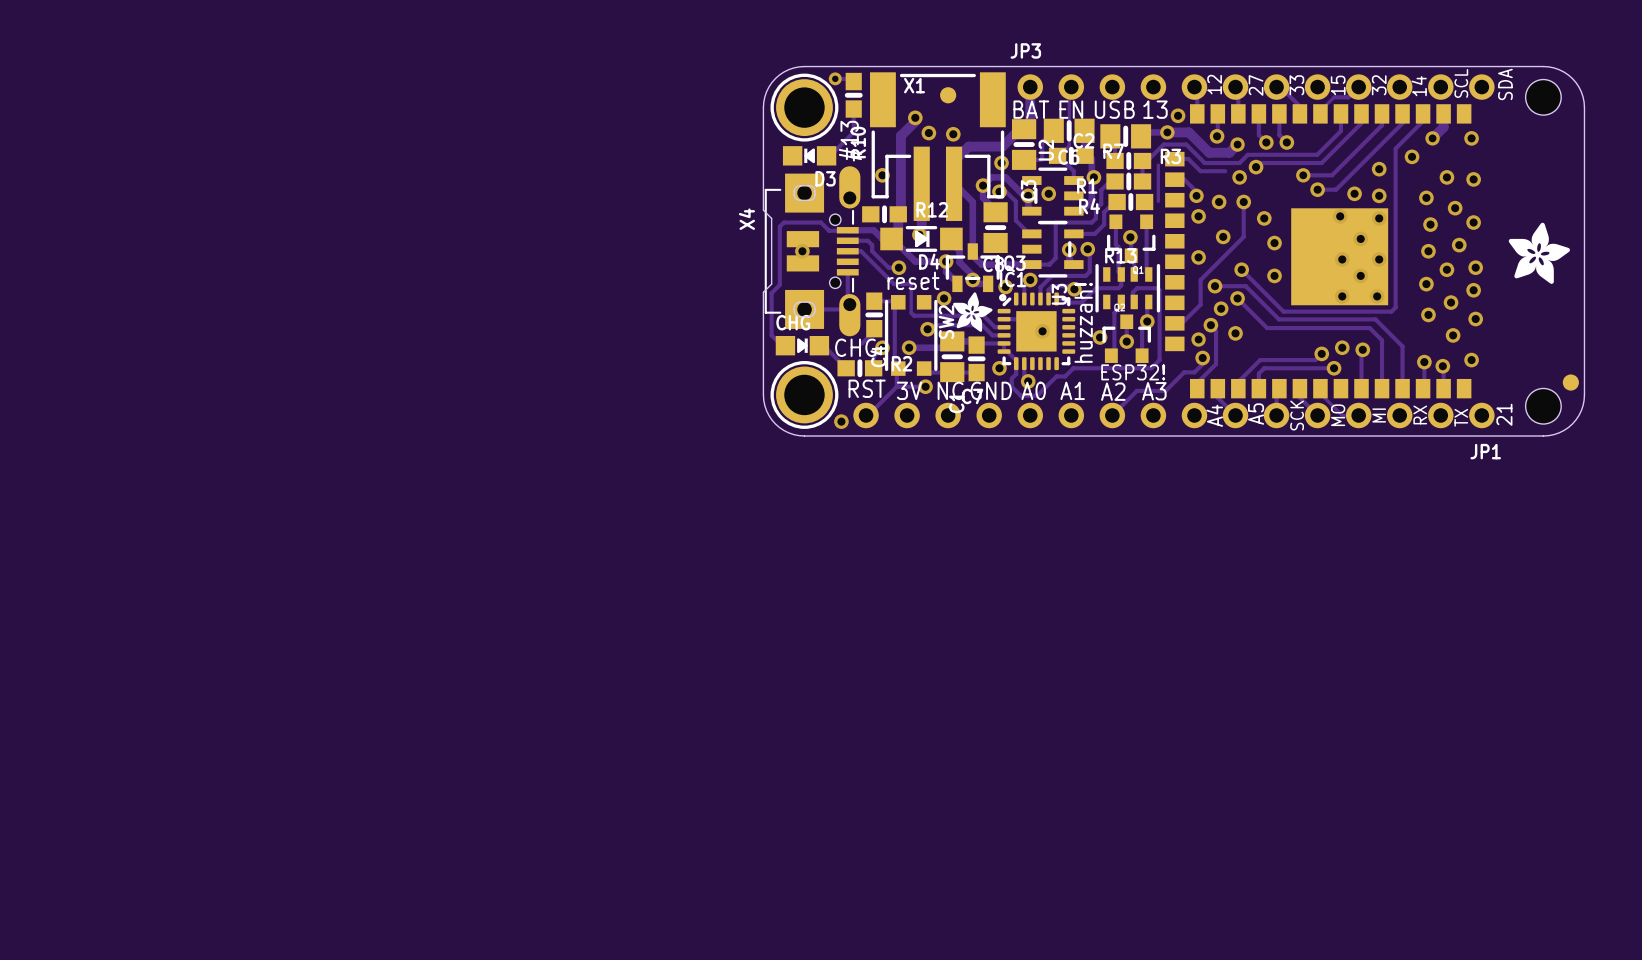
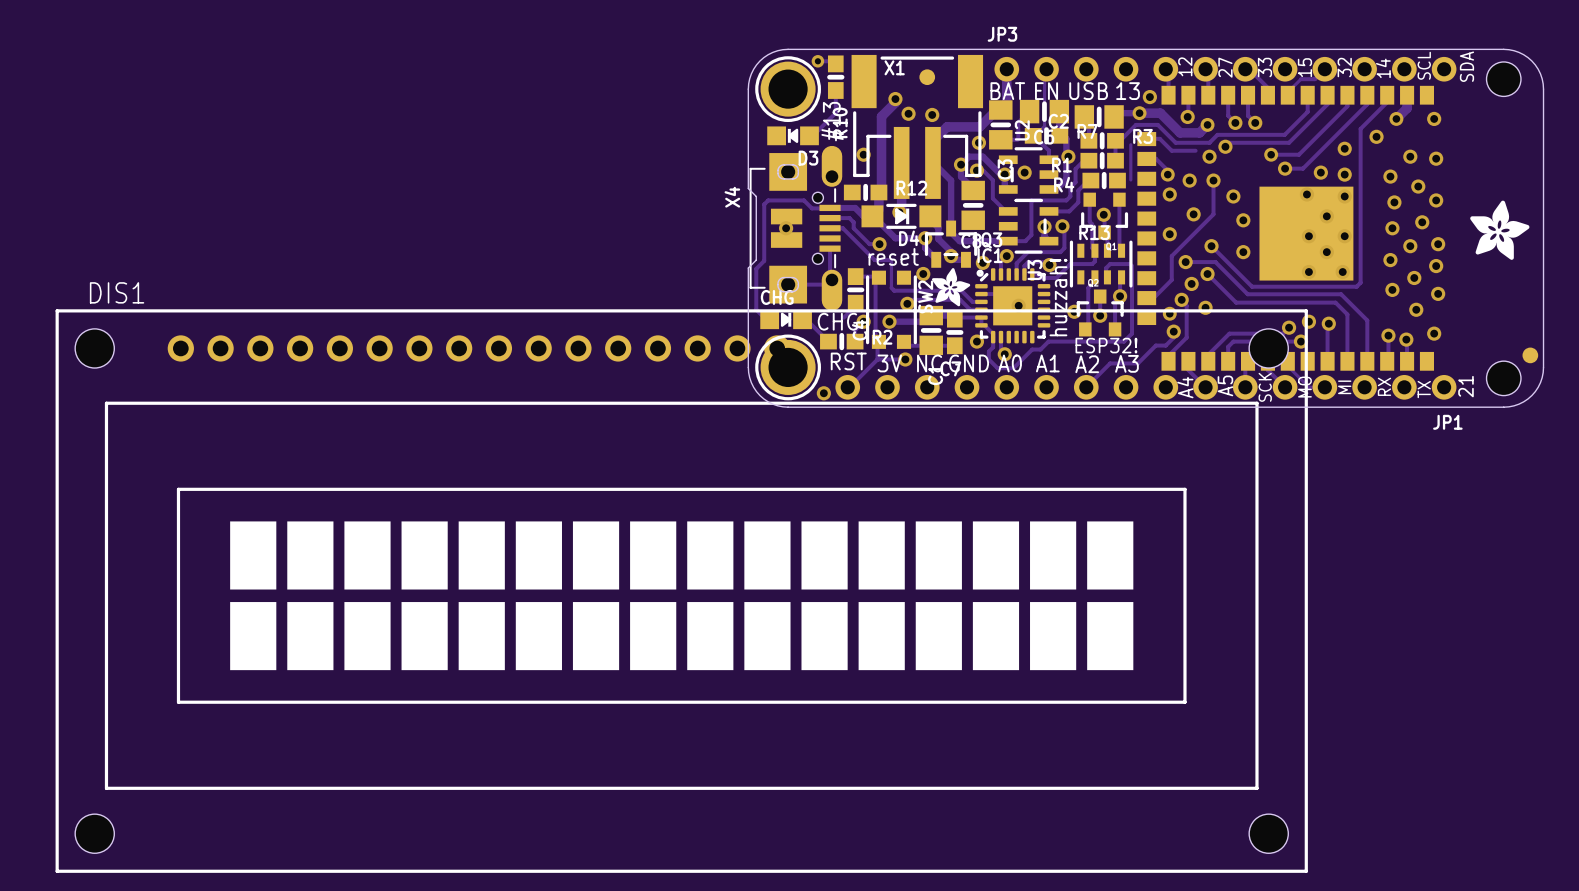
DIS1: none -> (681, 591)

